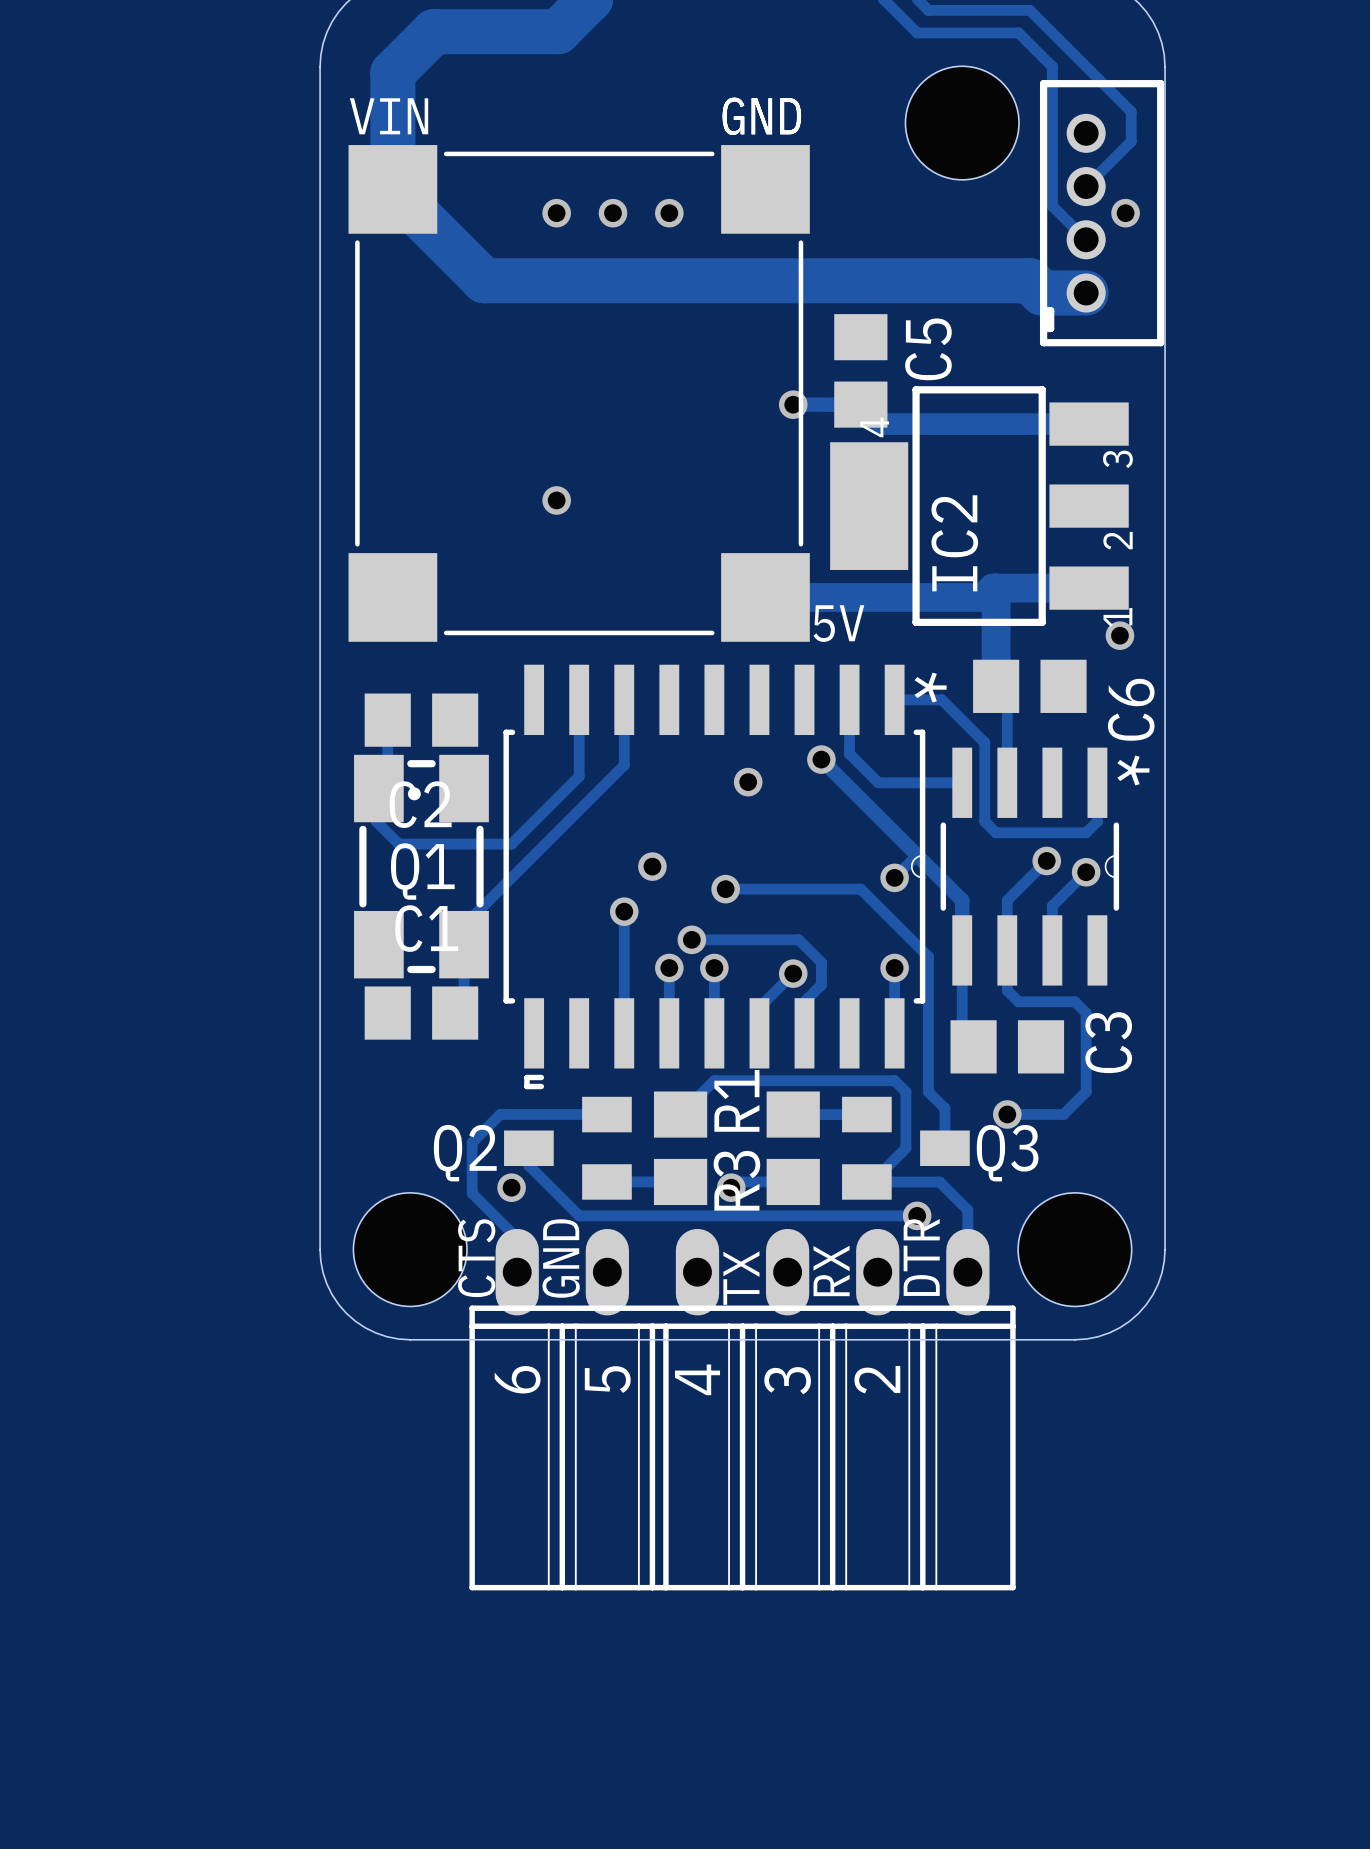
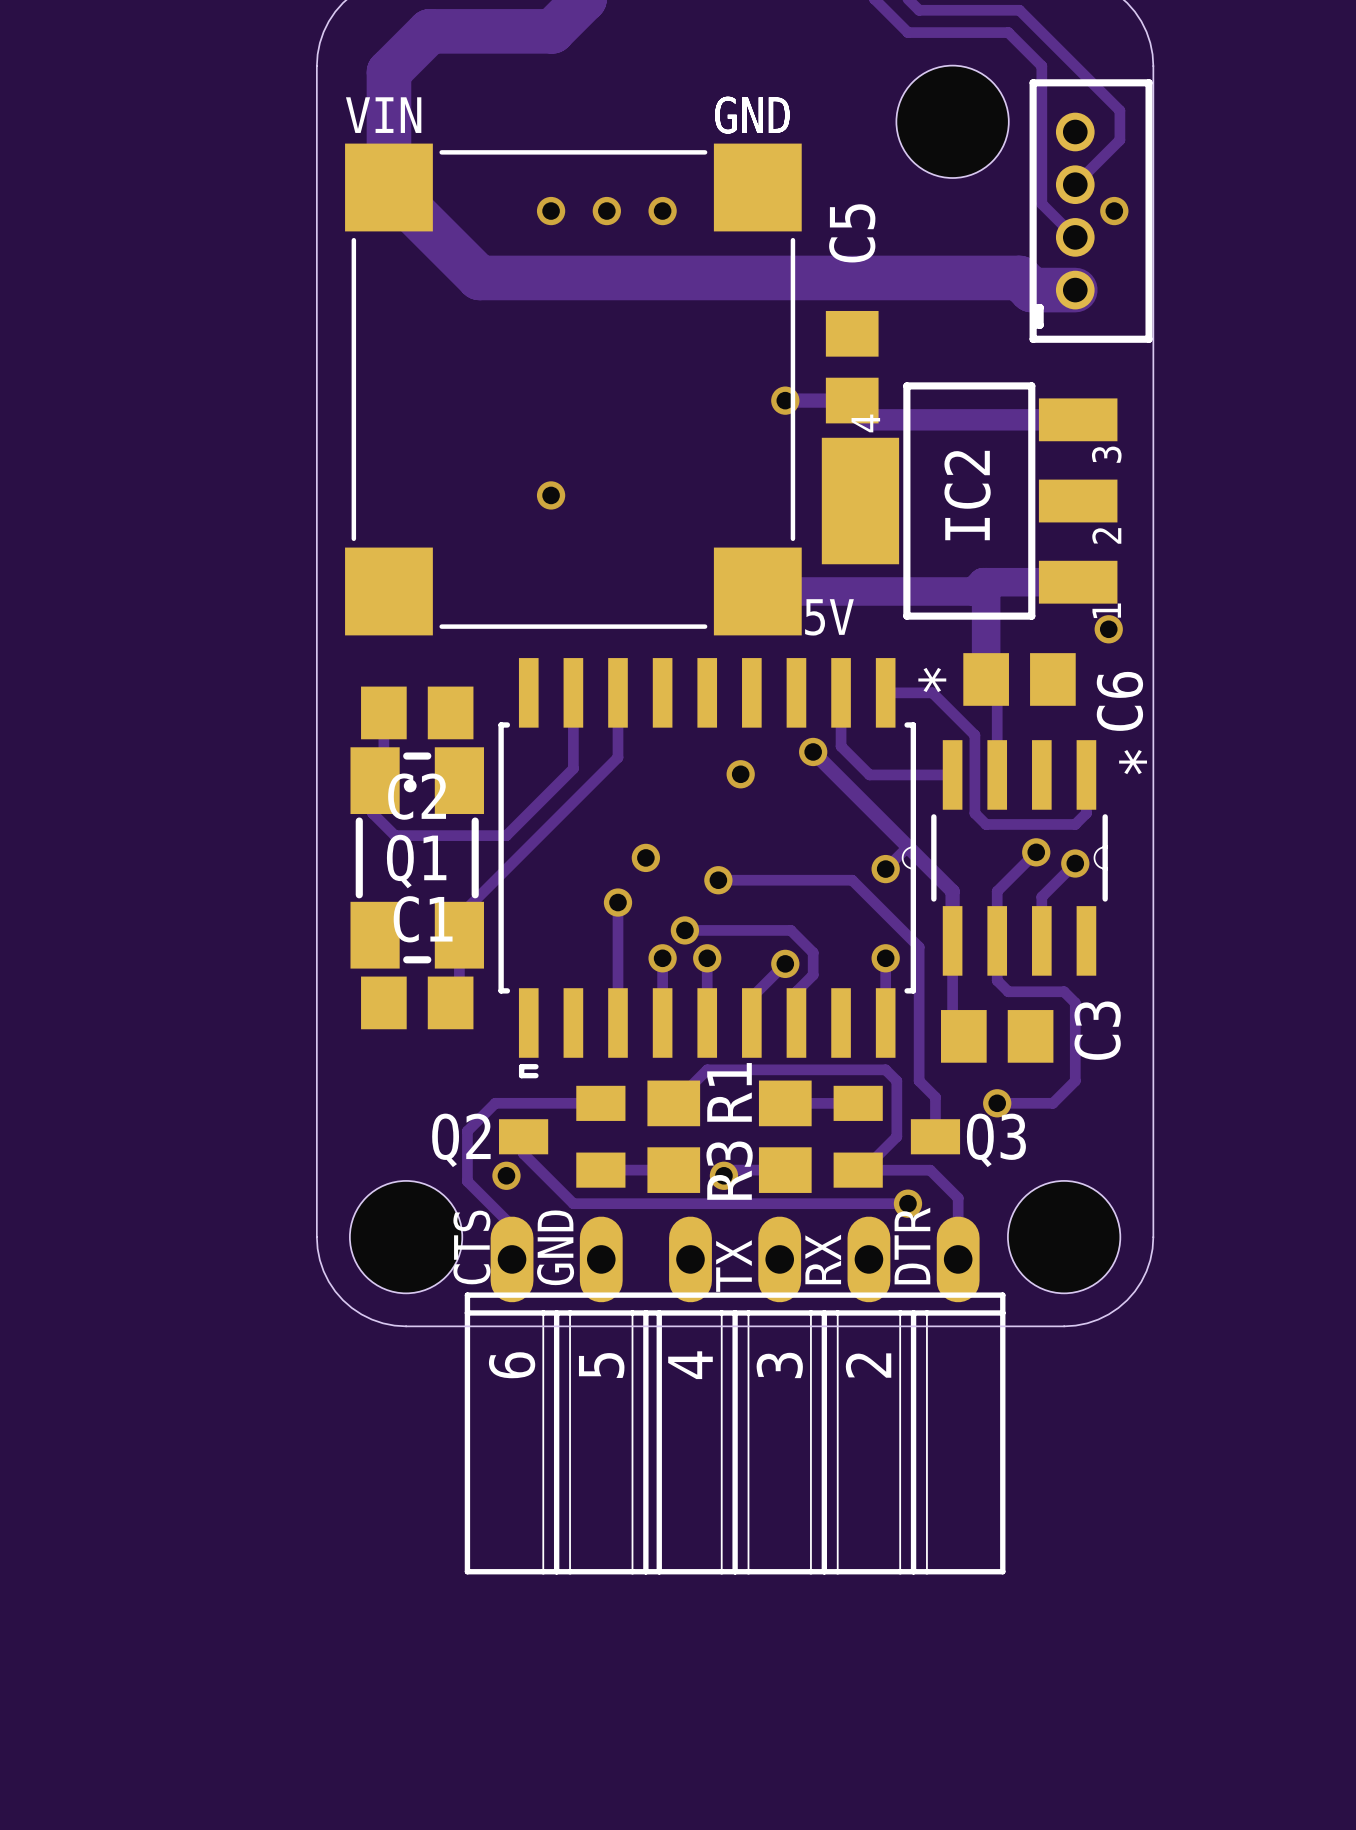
C5 name position: C5 (928, 349) -> C5 (852, 233)
IC2 name position: IC2 (954, 543) -> IC2 (967, 495)

